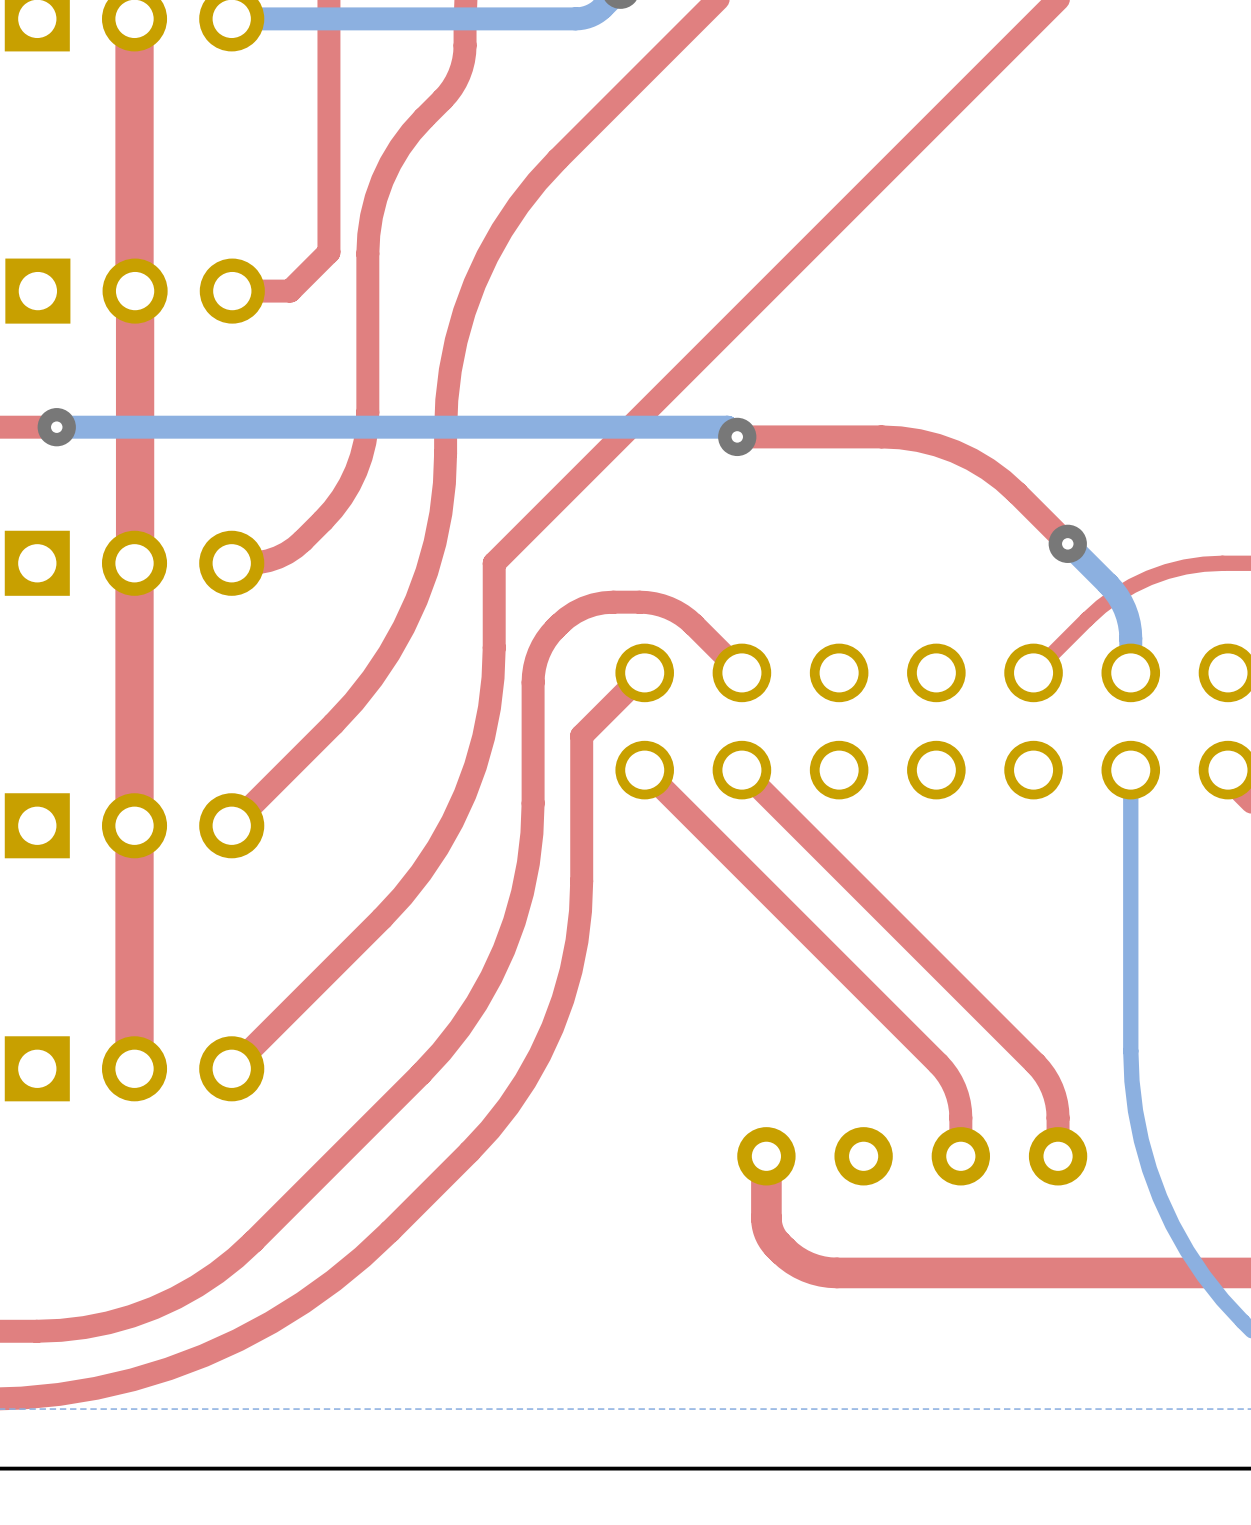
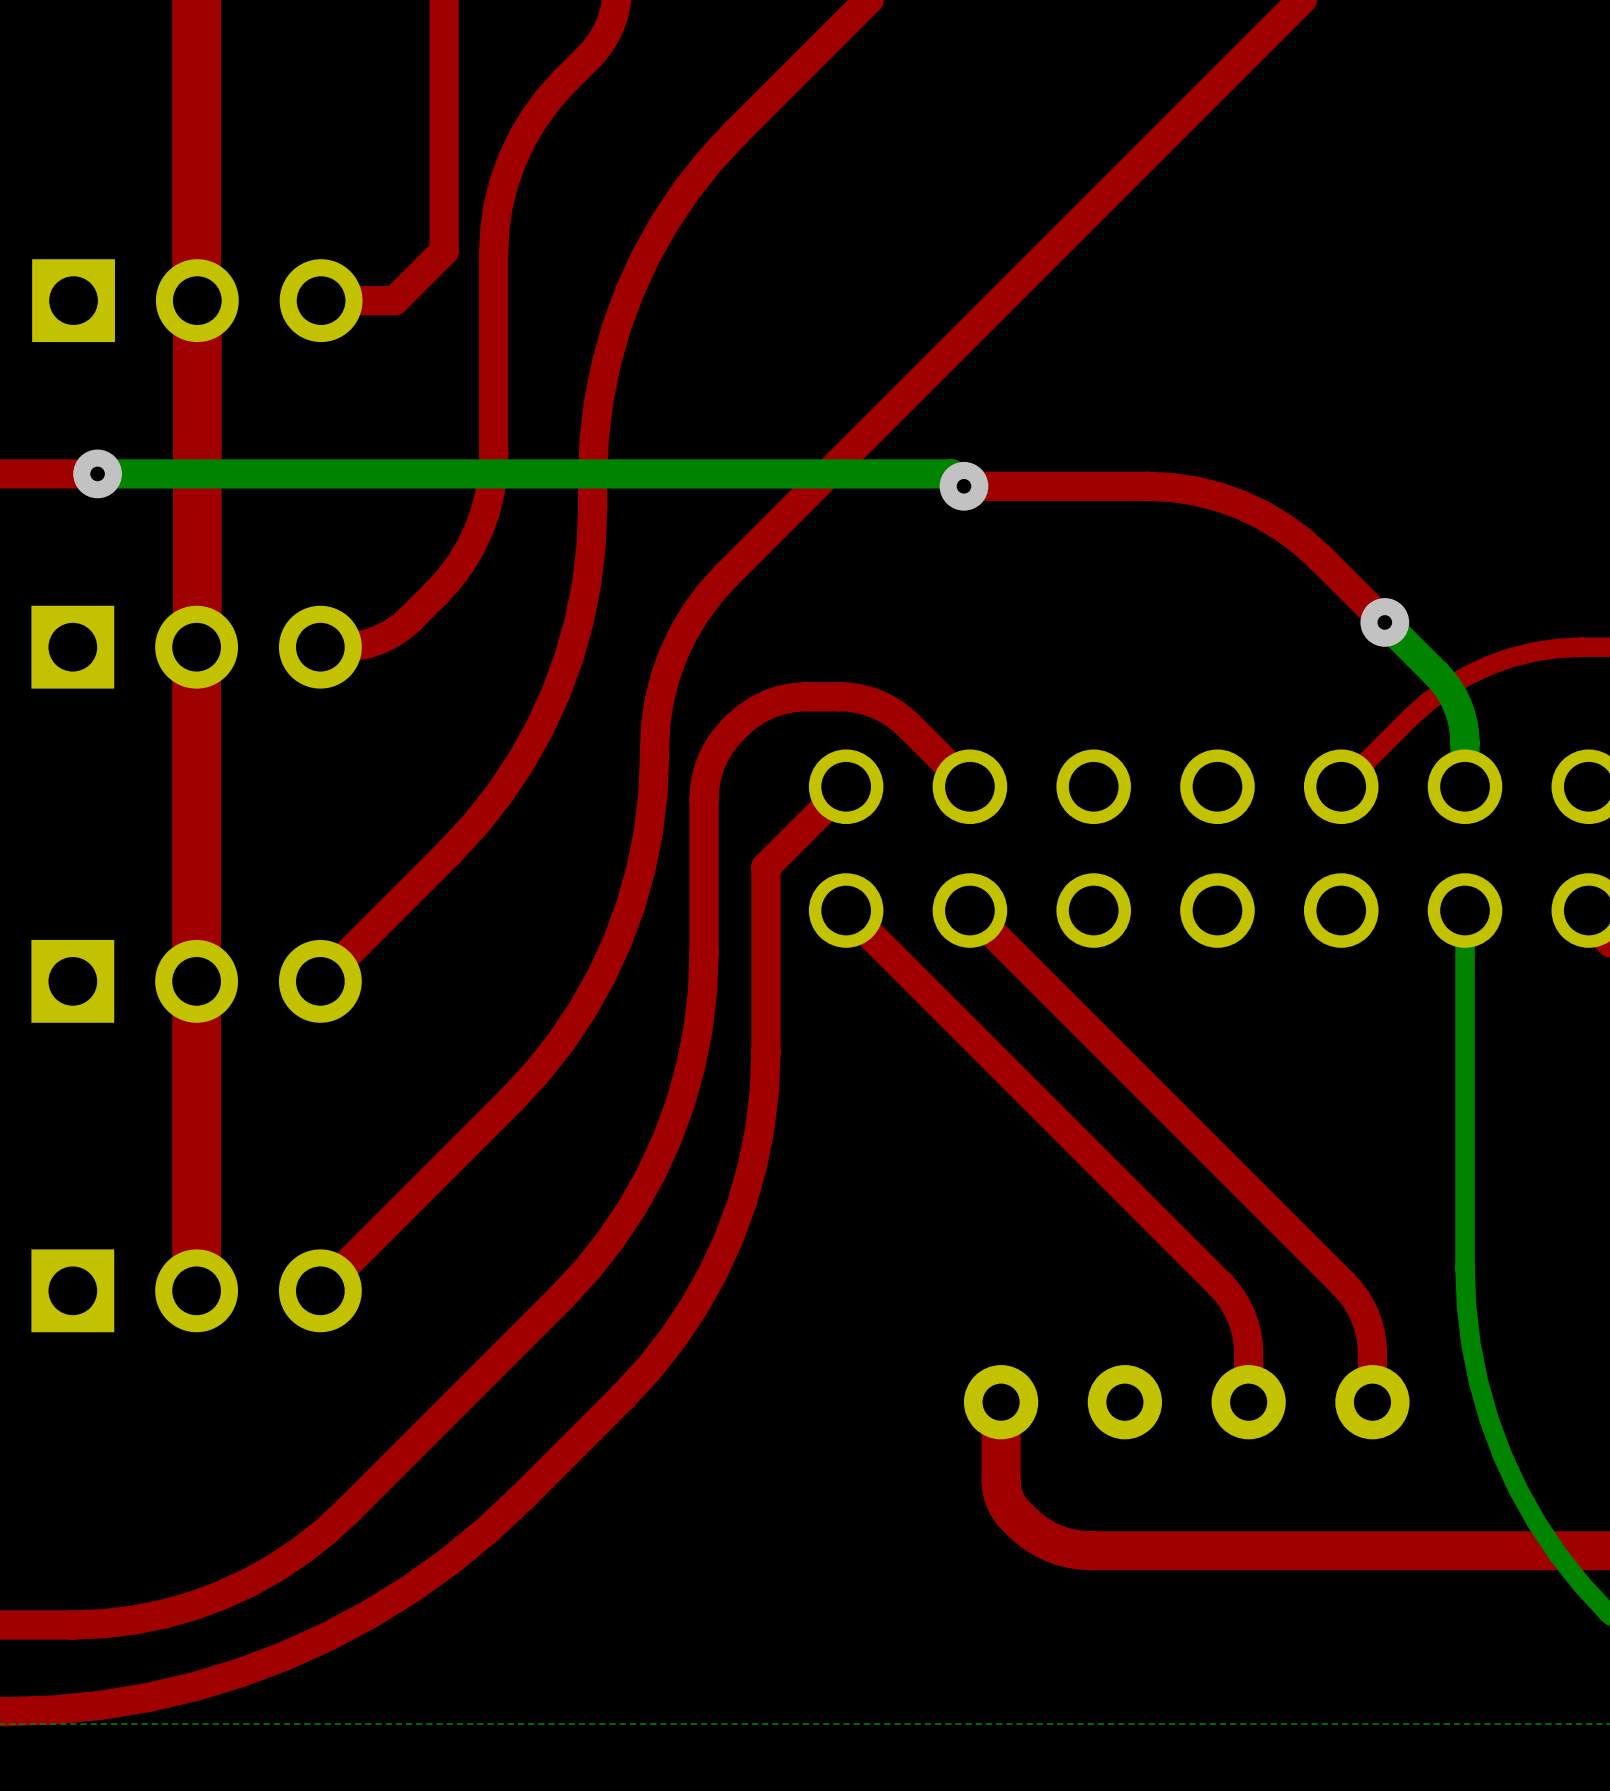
top track: (550, 507) (494, 563) (494, 642) -> (725, 575) (695, 612) (673, 654) (659, 700) (654, 748)

